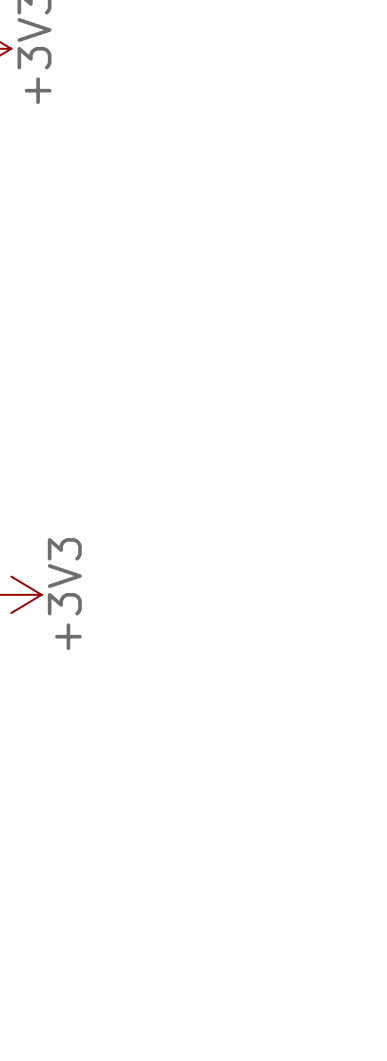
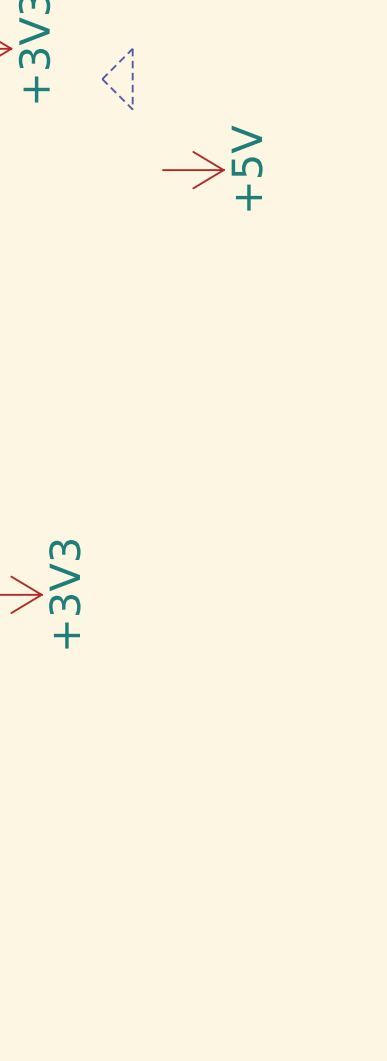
line: none -> (132, 48) (132, 109) (102, 79) (132, 48)
power symbol: none -> +5V (193, 170)

